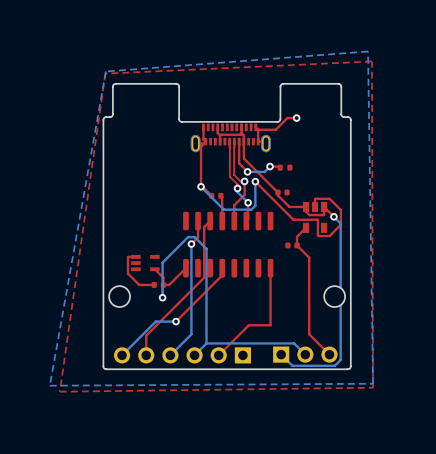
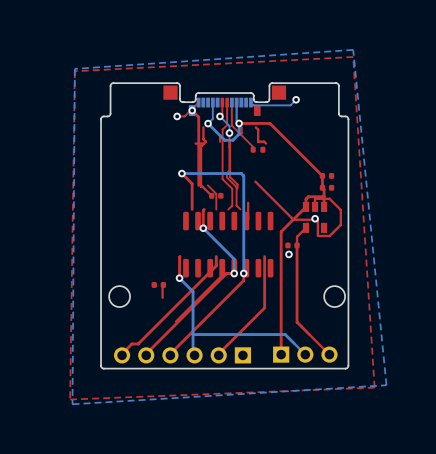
bottom zone outline: (368, 51) (373, 383) (49, 385) (105, 71) (368, 51) -> (353, 49) (386, 385) (72, 404) (74, 68) (353, 49)
top zone outline: (371, 61) (373, 387) (59, 391) (105, 73) (371, 61) -> (353, 56) (374, 387) (70, 399) (74, 71) (353, 56)
board edge: (338, 83) (281, 84) (280, 119) (277, 121) (181, 121) (179, 119) (177, 84) (113, 84) (112, 115) (104, 117) (103, 119) (104, 368) (350, 368) (350, 119) (349, 117) (341, 115) (341, 86) (338, 83) -> none
part: none -> (170, 92)
part: none -> (278, 92)
bottom track: none -> (296, 99) (290, 105) (253, 105) (250, 102)
top track: none -> (198, 102) (184, 116) (177, 116)
top track: none -> (222, 102) (222, 114) (219, 116)
top track: none -> (227, 102) (227, 125) (222, 129) (222, 179) (232, 188) (232, 205) (228, 209)
top track: none -> (231, 102) (231, 125) (253, 146) (253, 149)
top track: none -> (236, 102) (236, 120) (239, 123) (269, 123) (322, 175) (324, 206)
bottom track: none -> (236, 102) (239, 134) (232, 140) (224, 140) (208, 123) (212, 118) (212, 102)
board edge: none -> (265, 102) (269, 100) (269, 85) (271, 83) (336, 83) (338, 85) (339, 114) (347, 116) (348, 119) (348, 365) (346, 368) (101, 367) (101, 119) (102, 116) (110, 114) (110, 85) (113, 83) (177, 83) (179, 85) (180, 100) (183, 102)
part: none -> (224, 104)
top track: none -> (192, 110) (198, 117) (198, 185)
via: none -> (192, 110)
via: none -> (177, 116)
bottom track: none -> (219, 116) (229, 125) (229, 133)
via: none -> (219, 116)
top track: (296, 118) (287, 118) (275, 129) (258, 129) -> none
via position: (296, 118) -> (296, 99)
via: none -> (208, 123)
via: none -> (239, 123)
top track: (217, 127) (217, 133) (220, 135) (243, 135) (243, 158) (277, 192) (277, 195) (289, 206) (305, 206) (305, 211) (309, 215) (323, 215) (324, 206) (333, 216) -> none
top track: none -> (229, 133) (229, 170) (226, 177) (236, 187) (236, 205) (240, 209)
via: none -> (229, 133)
part: (230, 137) -> none
top track: (234, 141) (234, 174) (240, 181) (244, 181) (244, 194) (234, 205) (234, 221) -> none
top track: (239, 141) (239, 163) (247, 171) -> none
top track: (270, 166) (280, 167) -> none
bottom track: (270, 166) (264, 171) (247, 171) -> none
via: (270, 166) -> none
part position: (285, 167) -> (258, 149)
via: (247, 171) -> none
top track: none -> (181, 173) (192, 183) (192, 209)
bottom track: none -> (181, 173) (241, 173) (243, 175) (243, 273)
via: none -> (181, 173)
part: none -> (327, 175)
via: (244, 181) -> none
bottom track: (255, 181) (255, 205) (251, 209) (223, 209) (201, 186) -> none
via: (255, 181) -> none
top track: none -> (207, 185) (216, 193) (216, 209)
via: (201, 186) -> none
part: none -> (327, 187)
bottom track: (237, 188) (237, 192) (248, 202) -> none
via: (237, 188) -> none
part: (282, 192) -> none
top track: (220, 195) (222, 221) -> none
top track: none -> (324, 196) (308, 196) (305, 199) (305, 206) (281, 231) (281, 354)
via: (248, 202) -> none
top track: none -> (204, 209) (203, 228)
bottom track: (333, 216) (340, 223) (340, 359) (334, 365) (292, 365) (281, 354) -> none
via position: (333, 216) -> (315, 218)
top track: (198, 221) (198, 237) (191, 244) -> none
top track: (210, 221) (204, 227) (204, 277) (146, 335) (146, 355) -> none
bottom track: none -> (203, 228) (234, 259) (234, 273)
via: none -> (203, 228)
via: (191, 244) -> none
bottom track: (193, 245) (191, 244) (191, 334) (170, 355) -> none
top track: (297, 245) (309, 257) (309, 334) -> (297, 245) (297, 322) (309, 334)
via: none -> (288, 254)
top track: (135, 256) (128, 257) (128, 273) (139, 284) (154, 284) -> none
top track: none -> (180, 256) (179, 278)
top track: none -> (216, 256) (216, 265) (138, 343) (131, 343) (120, 355)
top track: none -> (264, 256) (264, 307) (217, 355)
part: (145, 263) -> none
top track: (185, 268) (169, 284) (163, 284) (163, 277) (154, 269) -> none
top track: (270, 268) (270, 325) (248, 325) (218, 355) -> none
top track: none -> (234, 273) (226, 273) (144, 355)
via: none -> (234, 273)
top track: none -> (243, 273) (243, 280) (168, 355)
via: none -> (243, 273)
bottom track: none -> (179, 278) (193, 291) (193, 355)
via: none -> (179, 278)
bottom track: (162, 297) (162, 262) (188, 237) (194, 237) (206, 248) (206, 343) -> none
via: (162, 297) -> none
bottom track: (176, 321) (155, 321) (122, 355) -> none
via: (176, 321) -> none
bottom track: (206, 343) (194, 355) -> none
bottom track: (294, 343) (206, 343) -> (294, 343) (285, 334) (193, 334)

